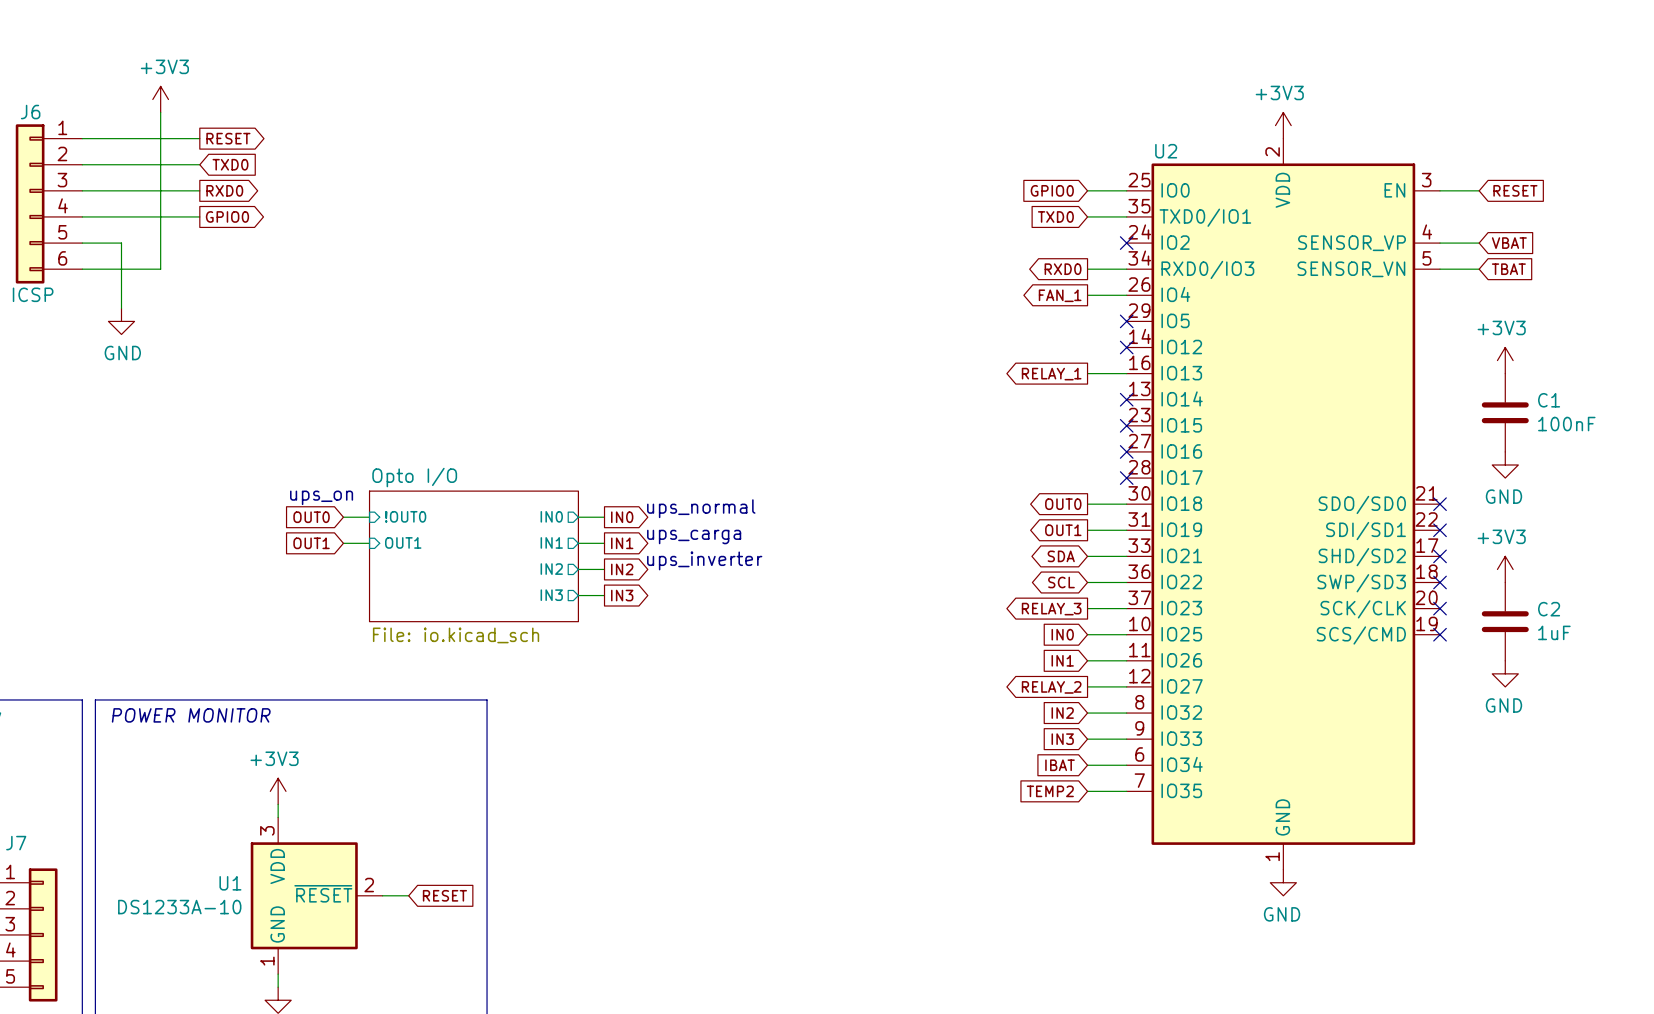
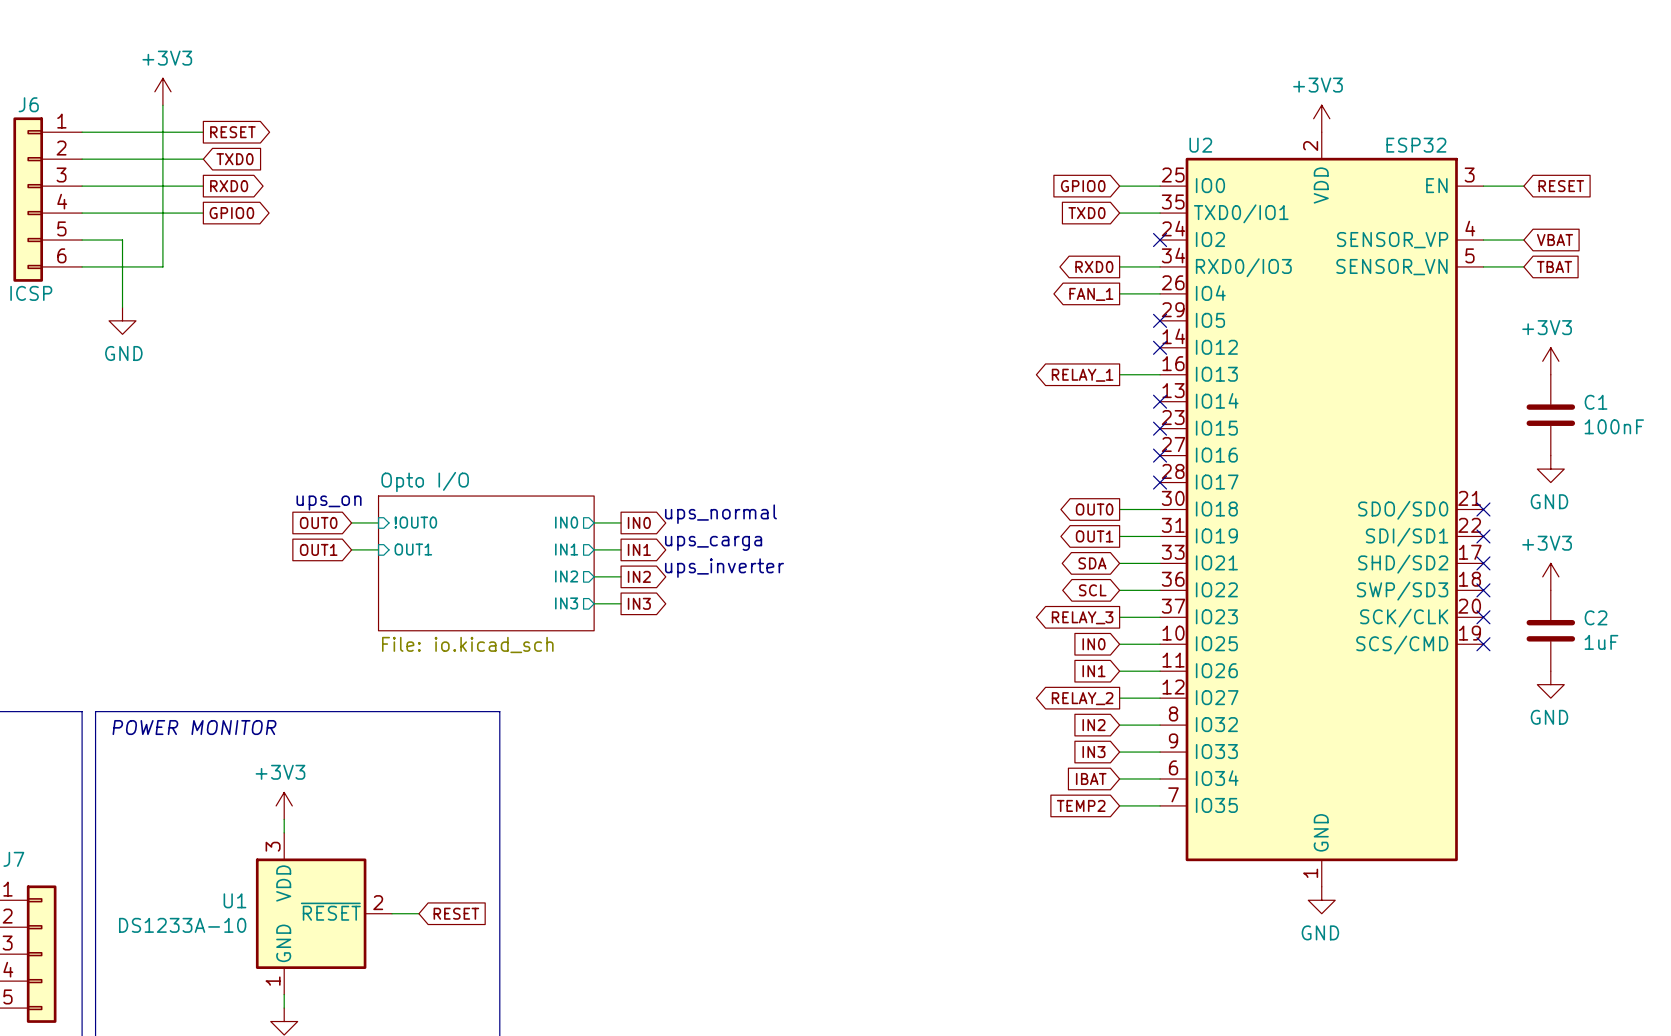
U2 value: none -> ESP32 (1416, 145)

